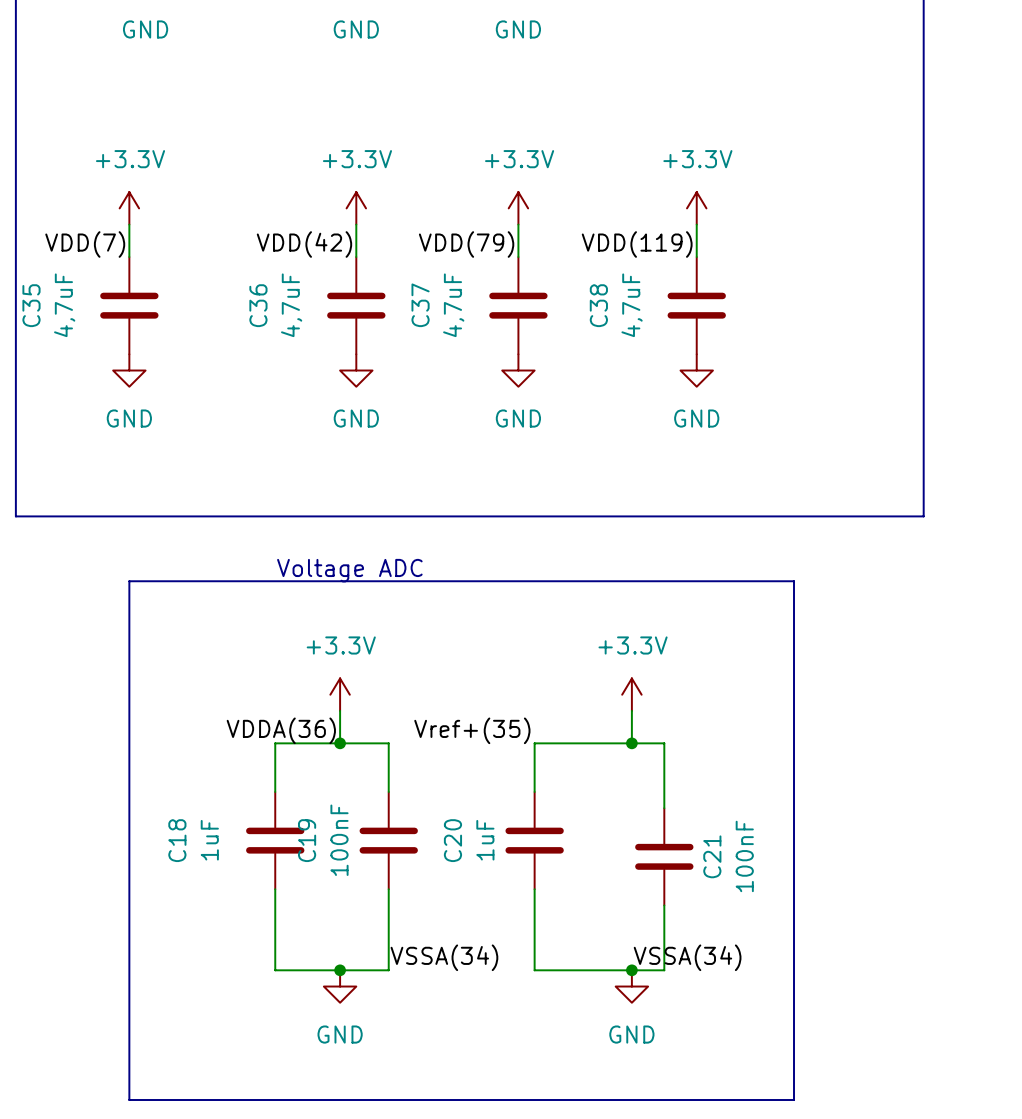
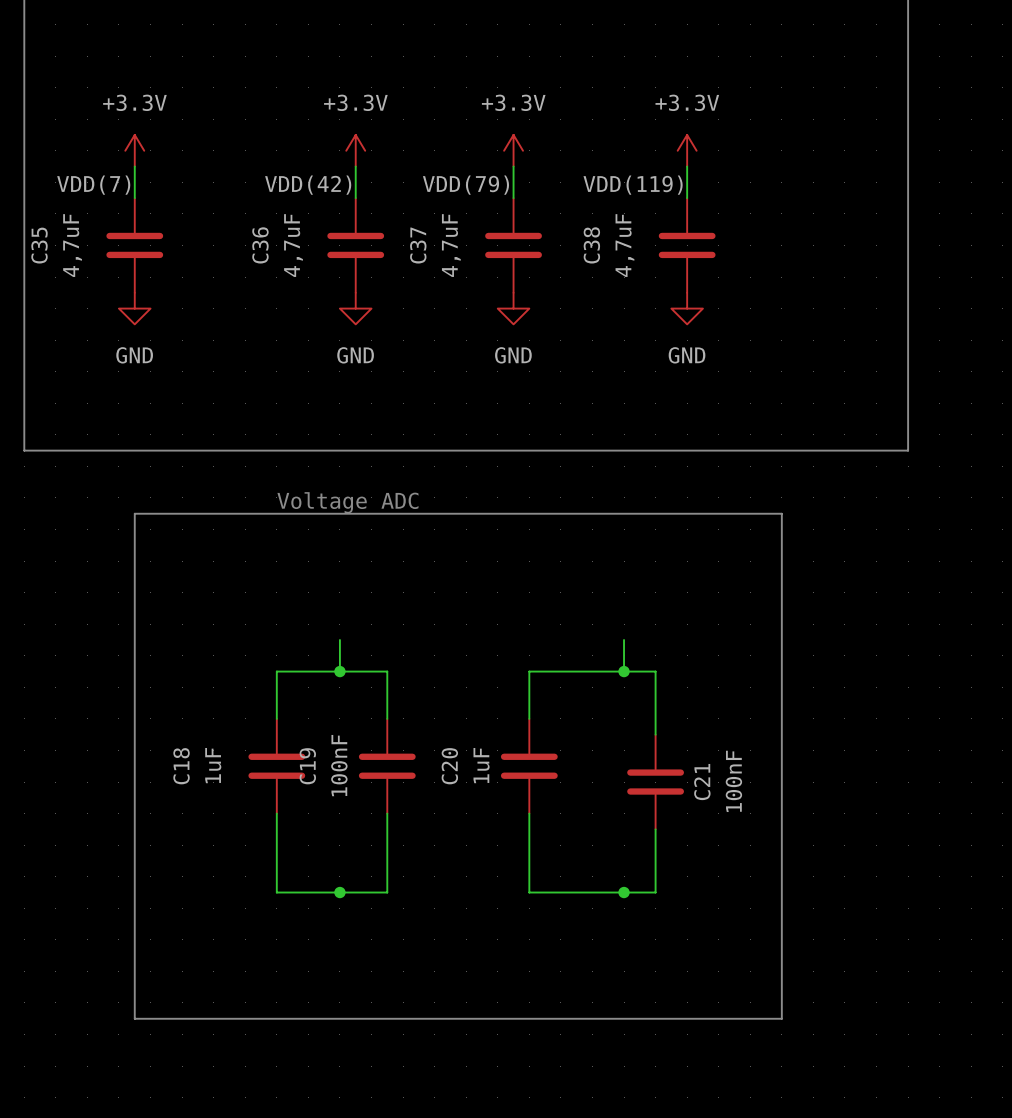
power symbol: +3.3V (340, 694) -> none
power symbol: +3.3V (631, 694) -> none
label: VDDA(36) (281, 730) -> none
label: Vref+(35) (472, 730) -> none
label: VSSA(34) (444, 957) -> none
label: VSSA(34) (687, 957) -> none
power symbol: GND (340, 986) -> none
power symbol: GND (631, 986) -> none

